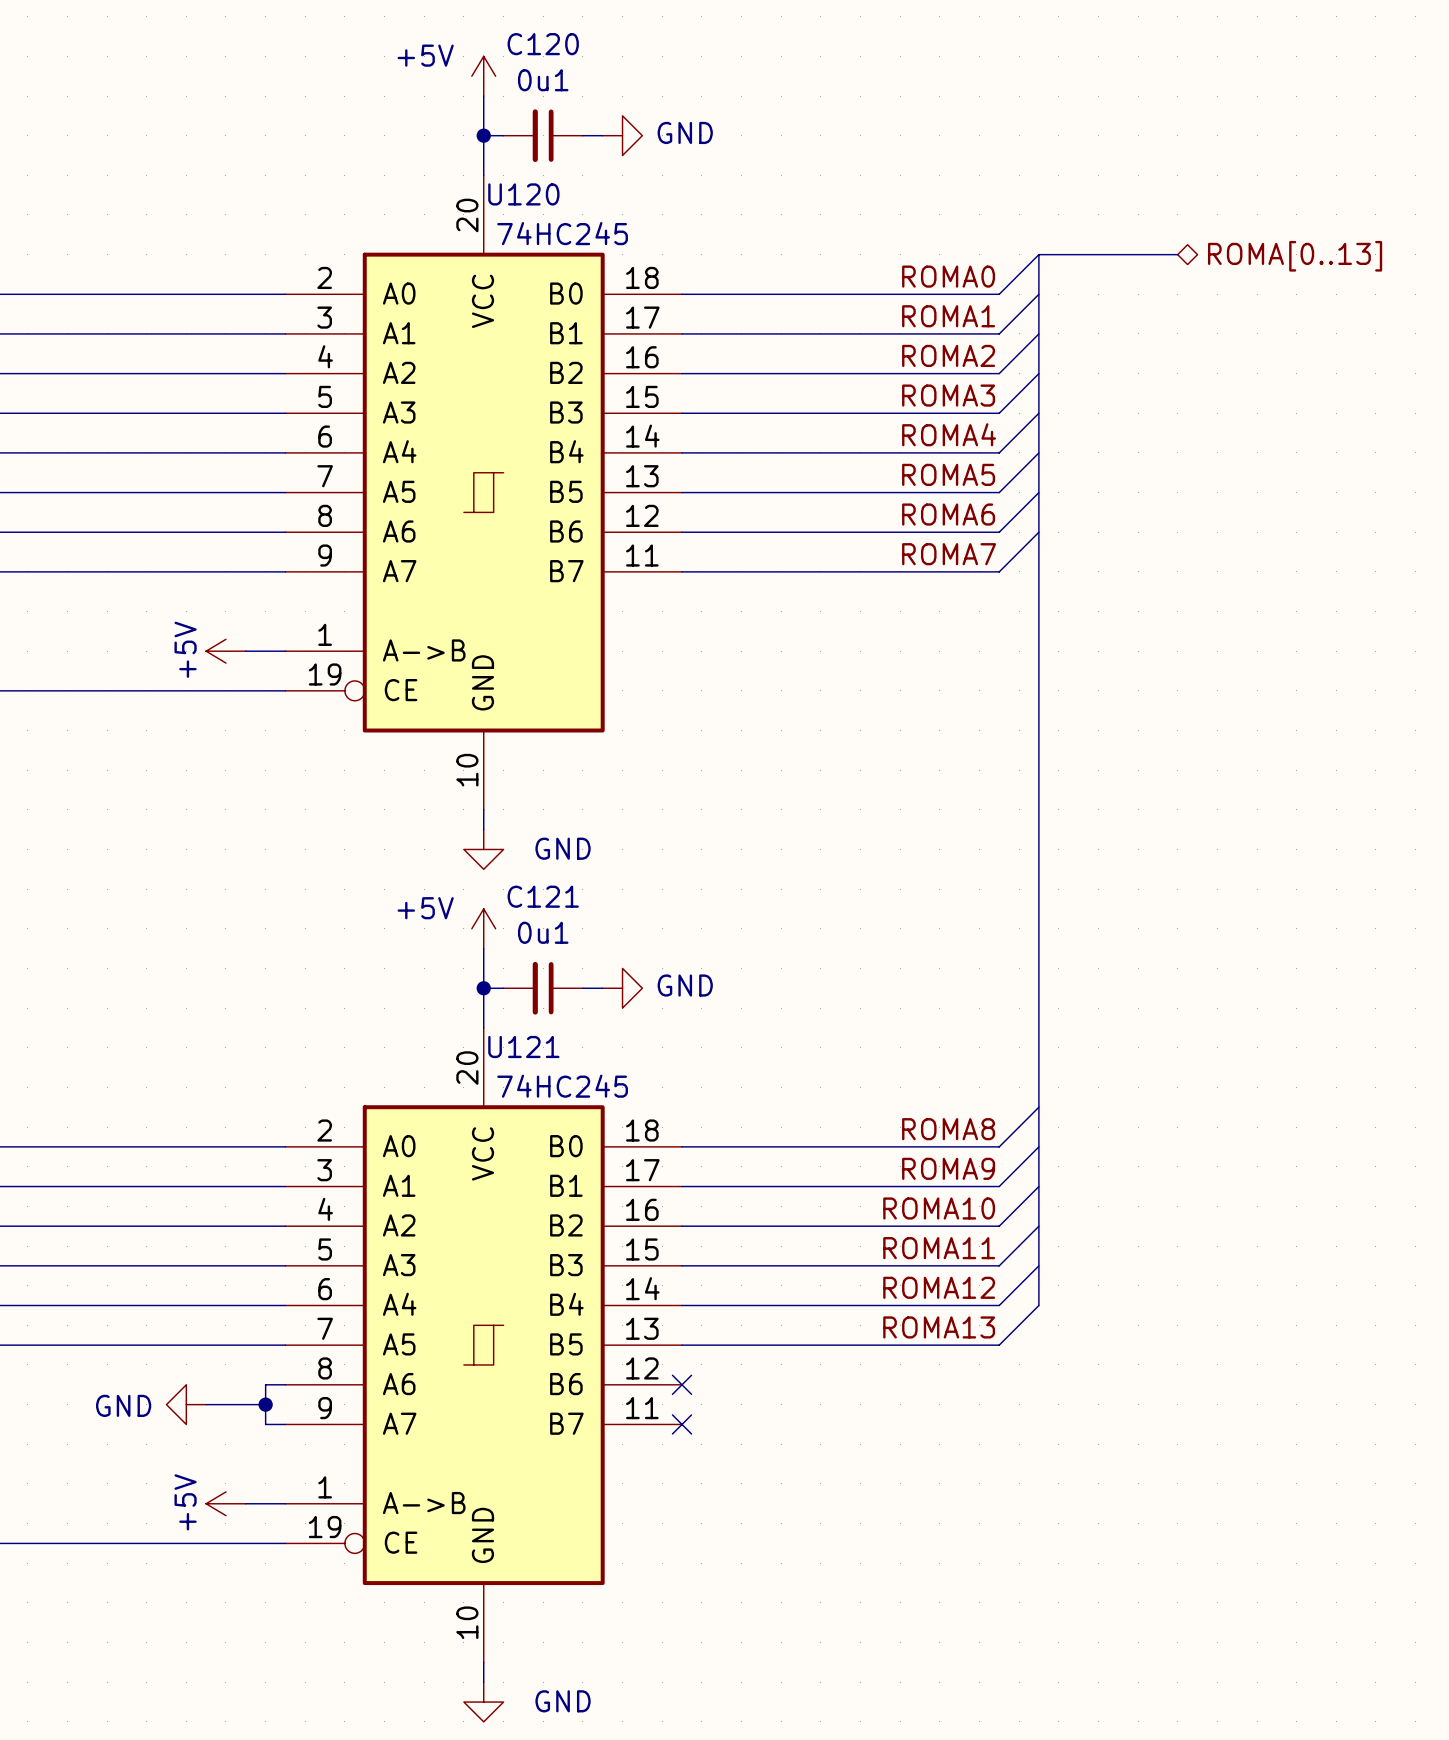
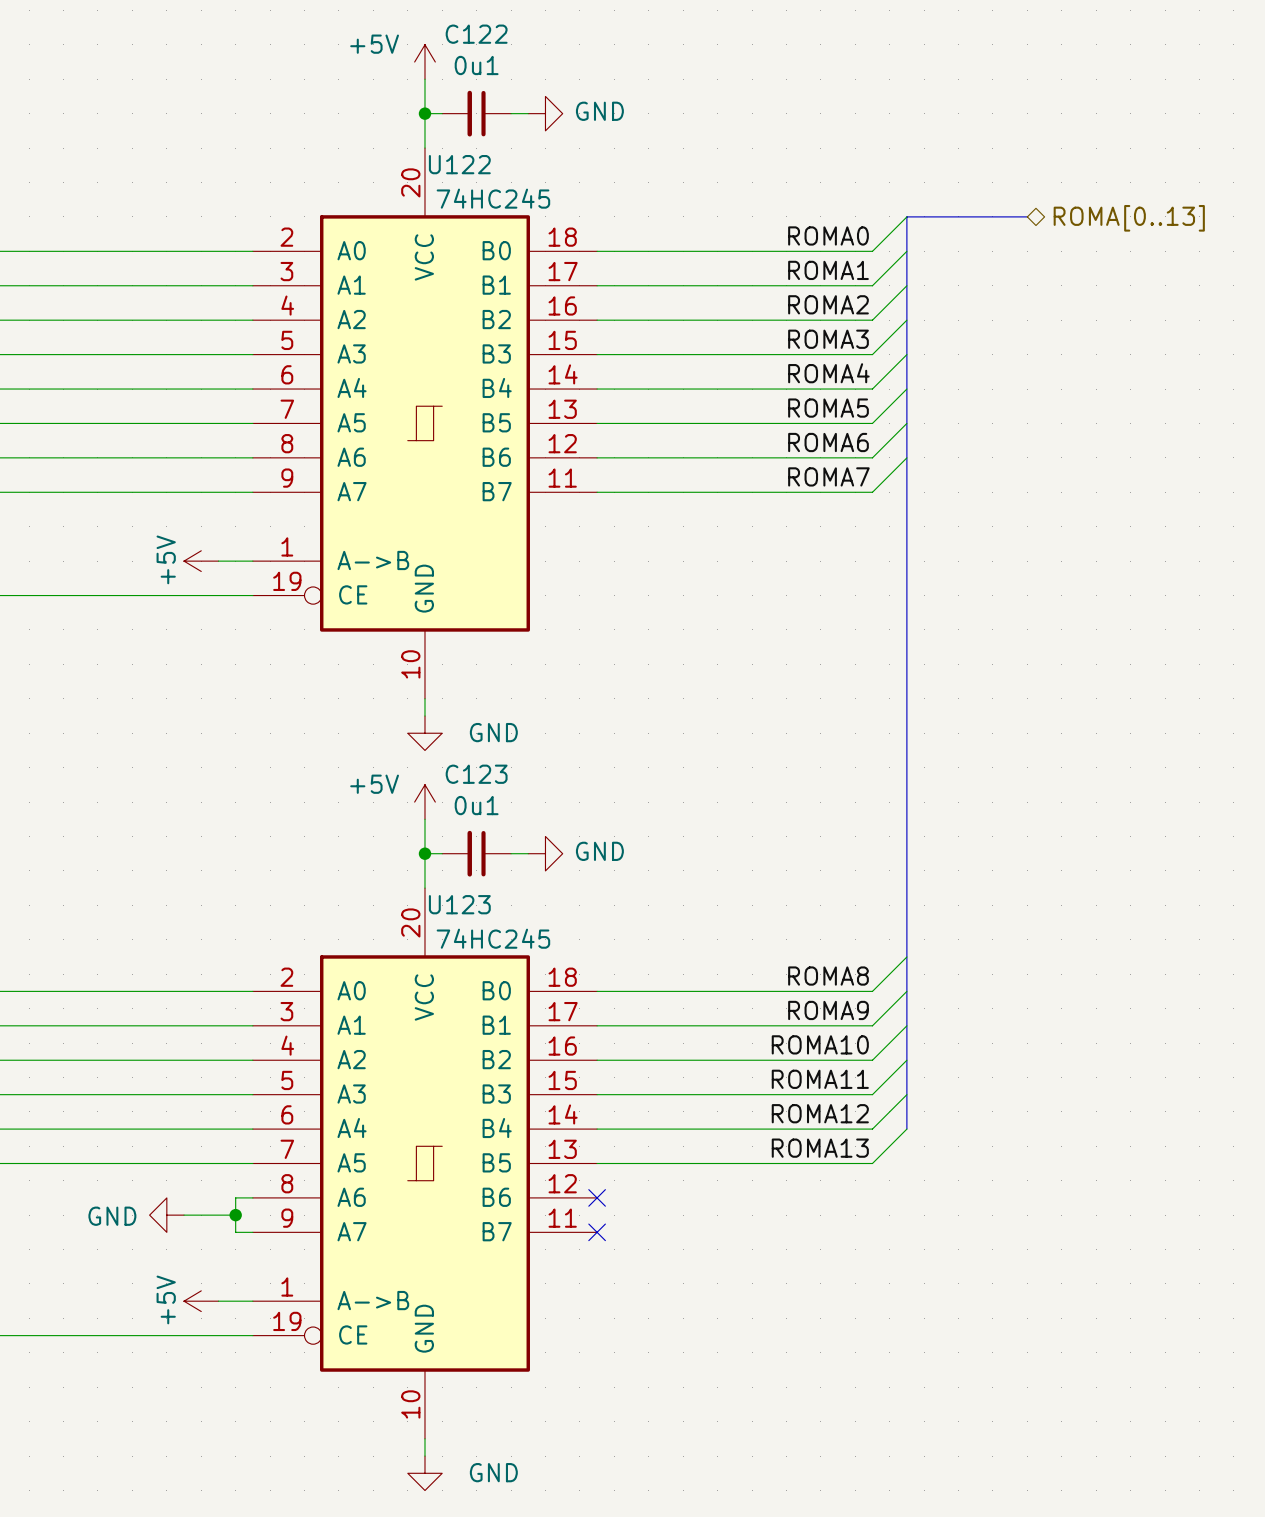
C120 name: C120 (543, 44) -> C122 (476, 34)
U120 name: U120 (523, 194) -> U122 (459, 164)
C121 name: C121 (543, 896) -> C123 (476, 774)
U121 name: U121 (523, 1047) -> U123 (459, 904)

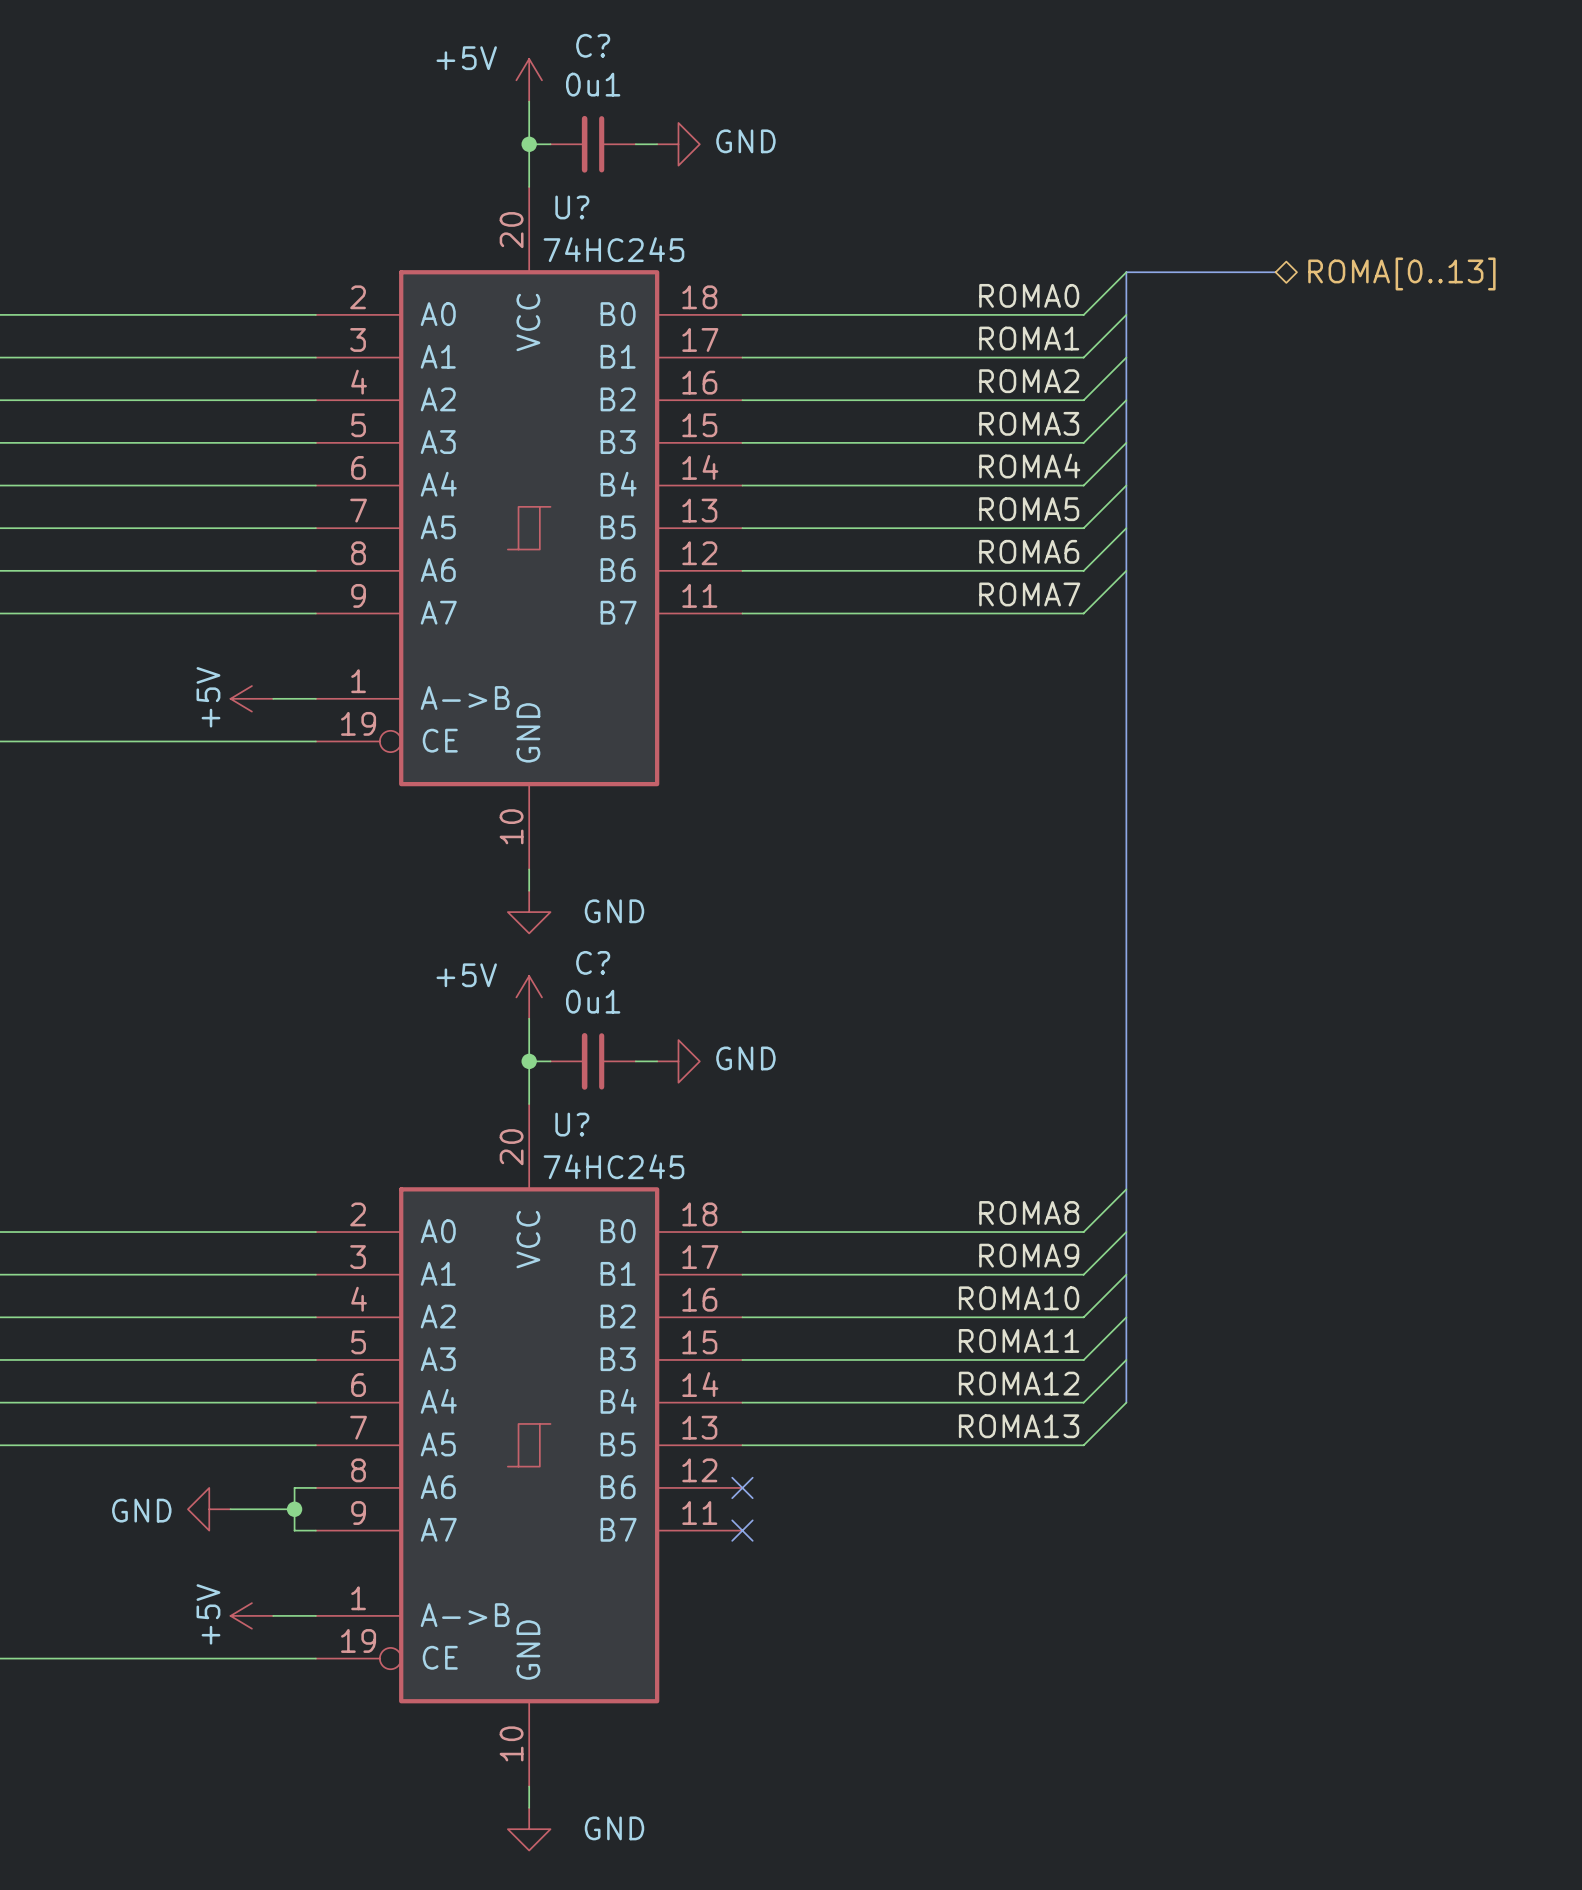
C122 name: C122 (476, 34) -> C? (593, 45)
U122 name: U122 (459, 164) -> U? (572, 207)
C123 name: C123 (476, 774) -> C? (593, 962)
U123 name: U123 (459, 904) -> U? (572, 1124)

